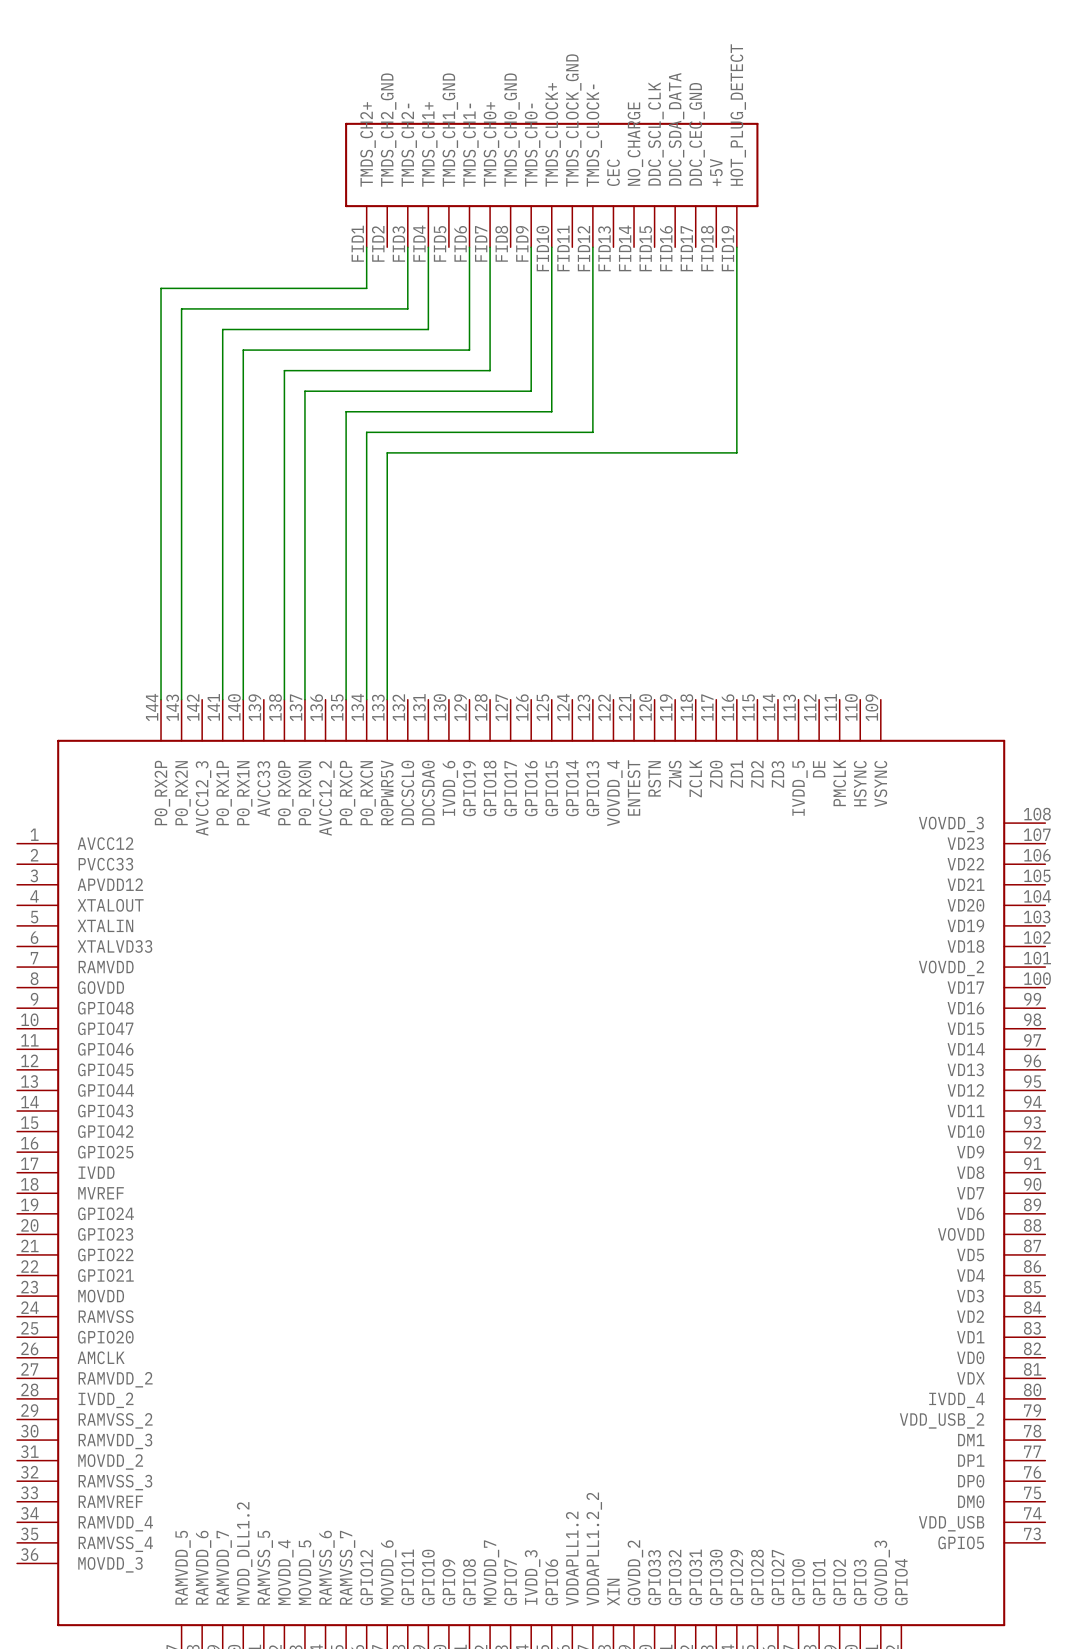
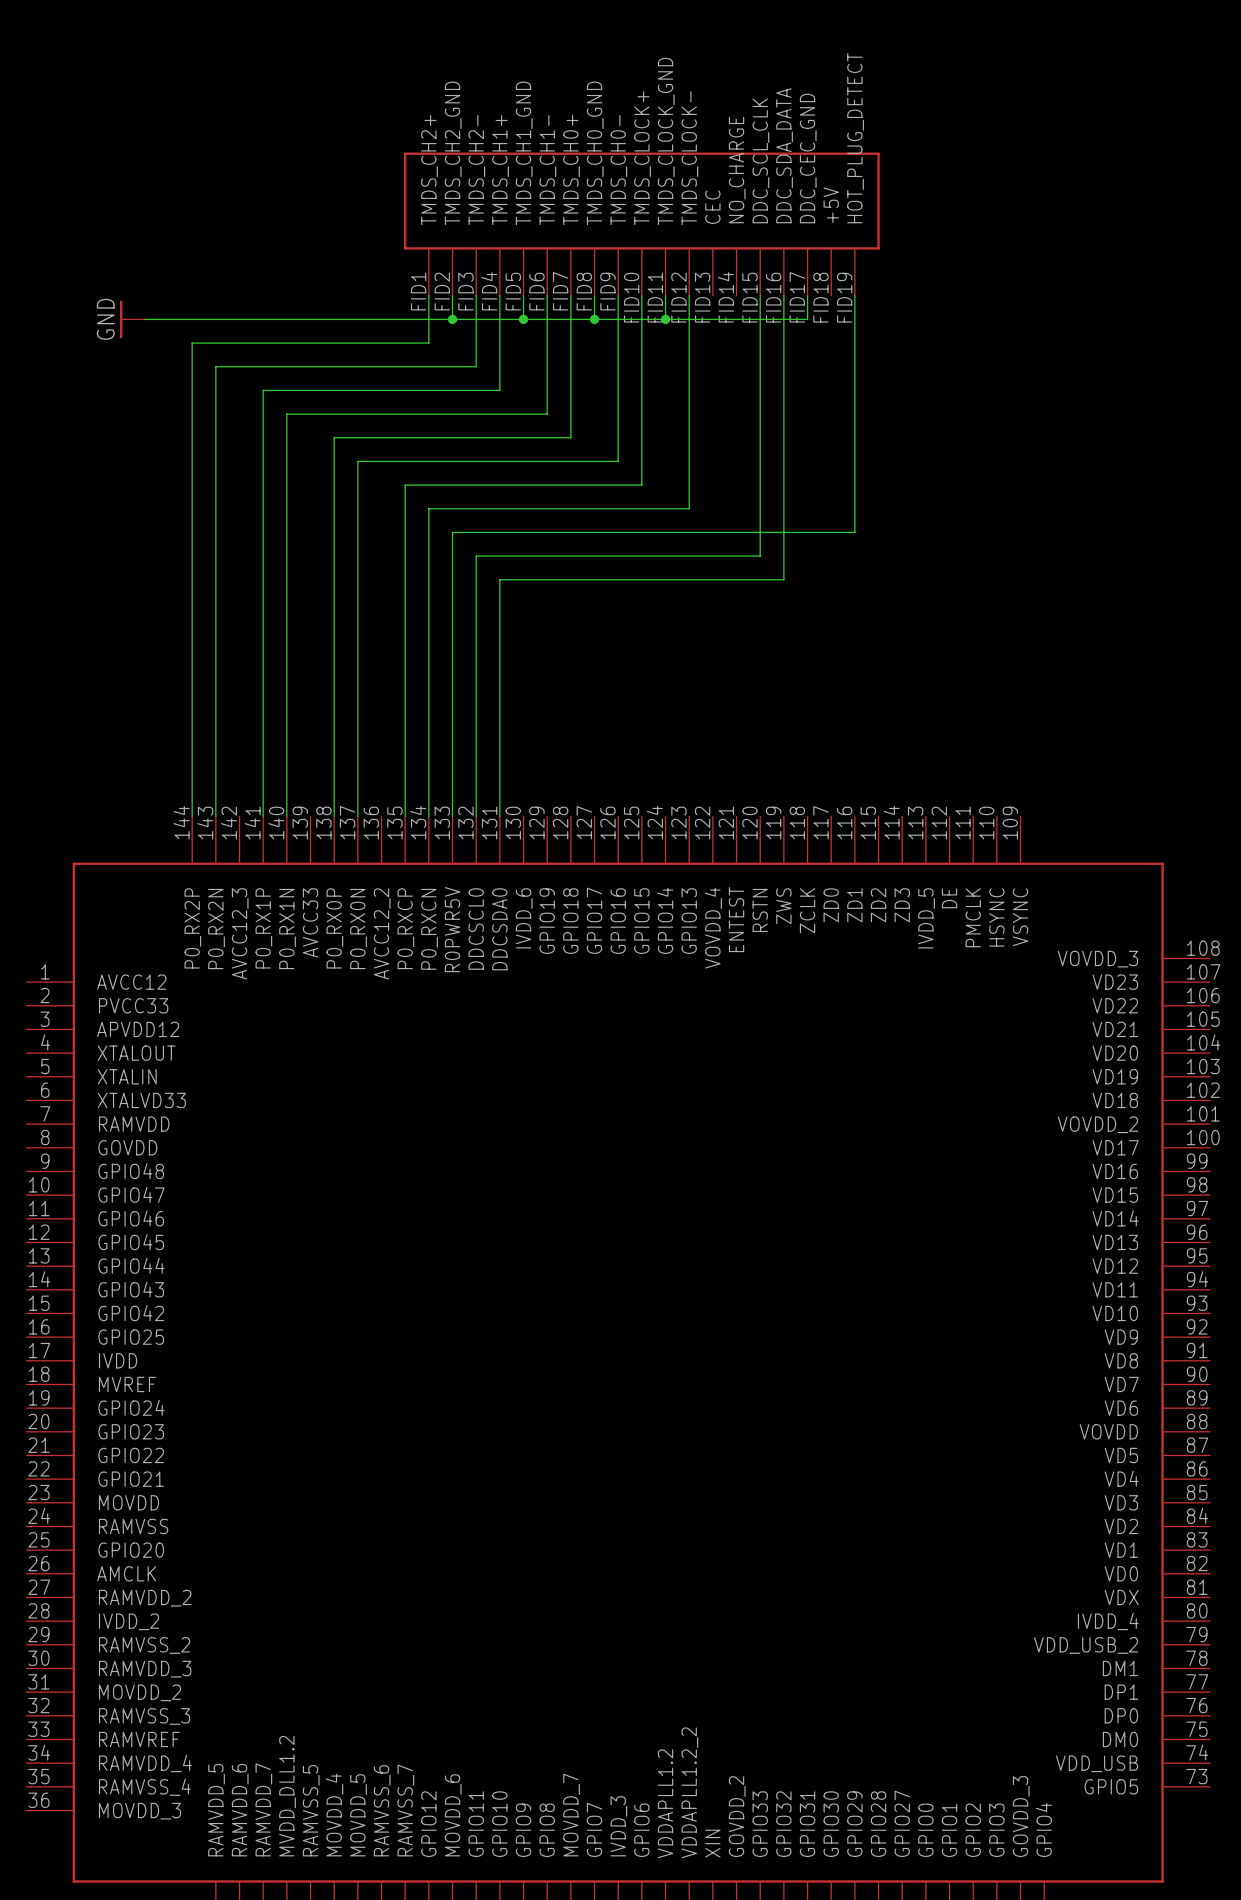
wire: none -> (452, 295) (452, 319)
wire: none -> (523, 295) (523, 319)
wire: none -> (594, 295) (594, 319)
wire: none -> (665, 295) (665, 319)
wire: none -> (760, 295) (760, 556) (476, 556) (476, 816)
wire: none -> (783, 295) (783, 579) (499, 579) (499, 816)
wire: none -> (807, 295) (807, 319) (144, 319)
power symbol: none -> GND (132, 319)
junction: none -> (452, 319)
junction: none -> (523, 319)
junction: none -> (594, 319)
junction: none -> (665, 319)

